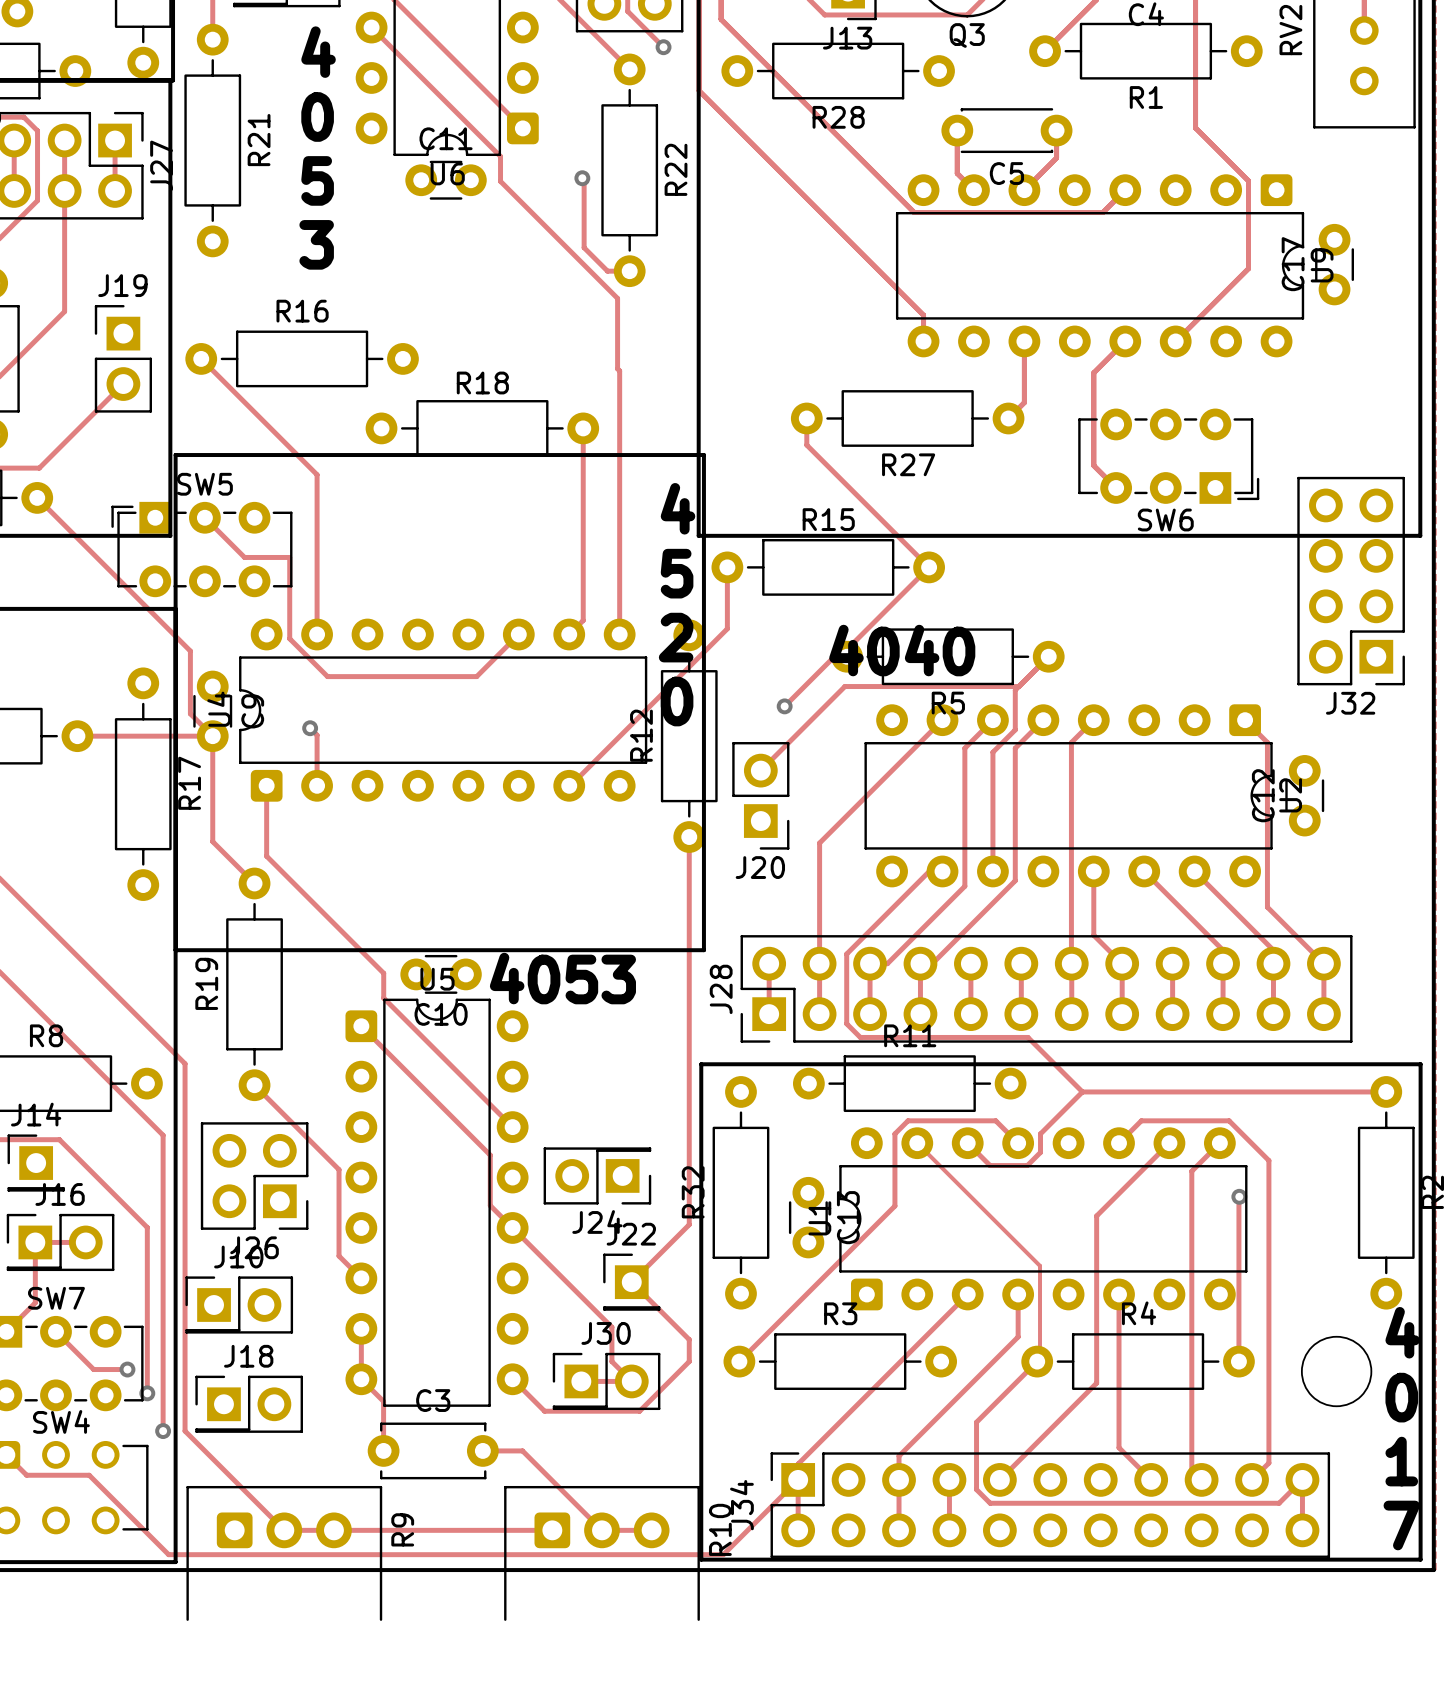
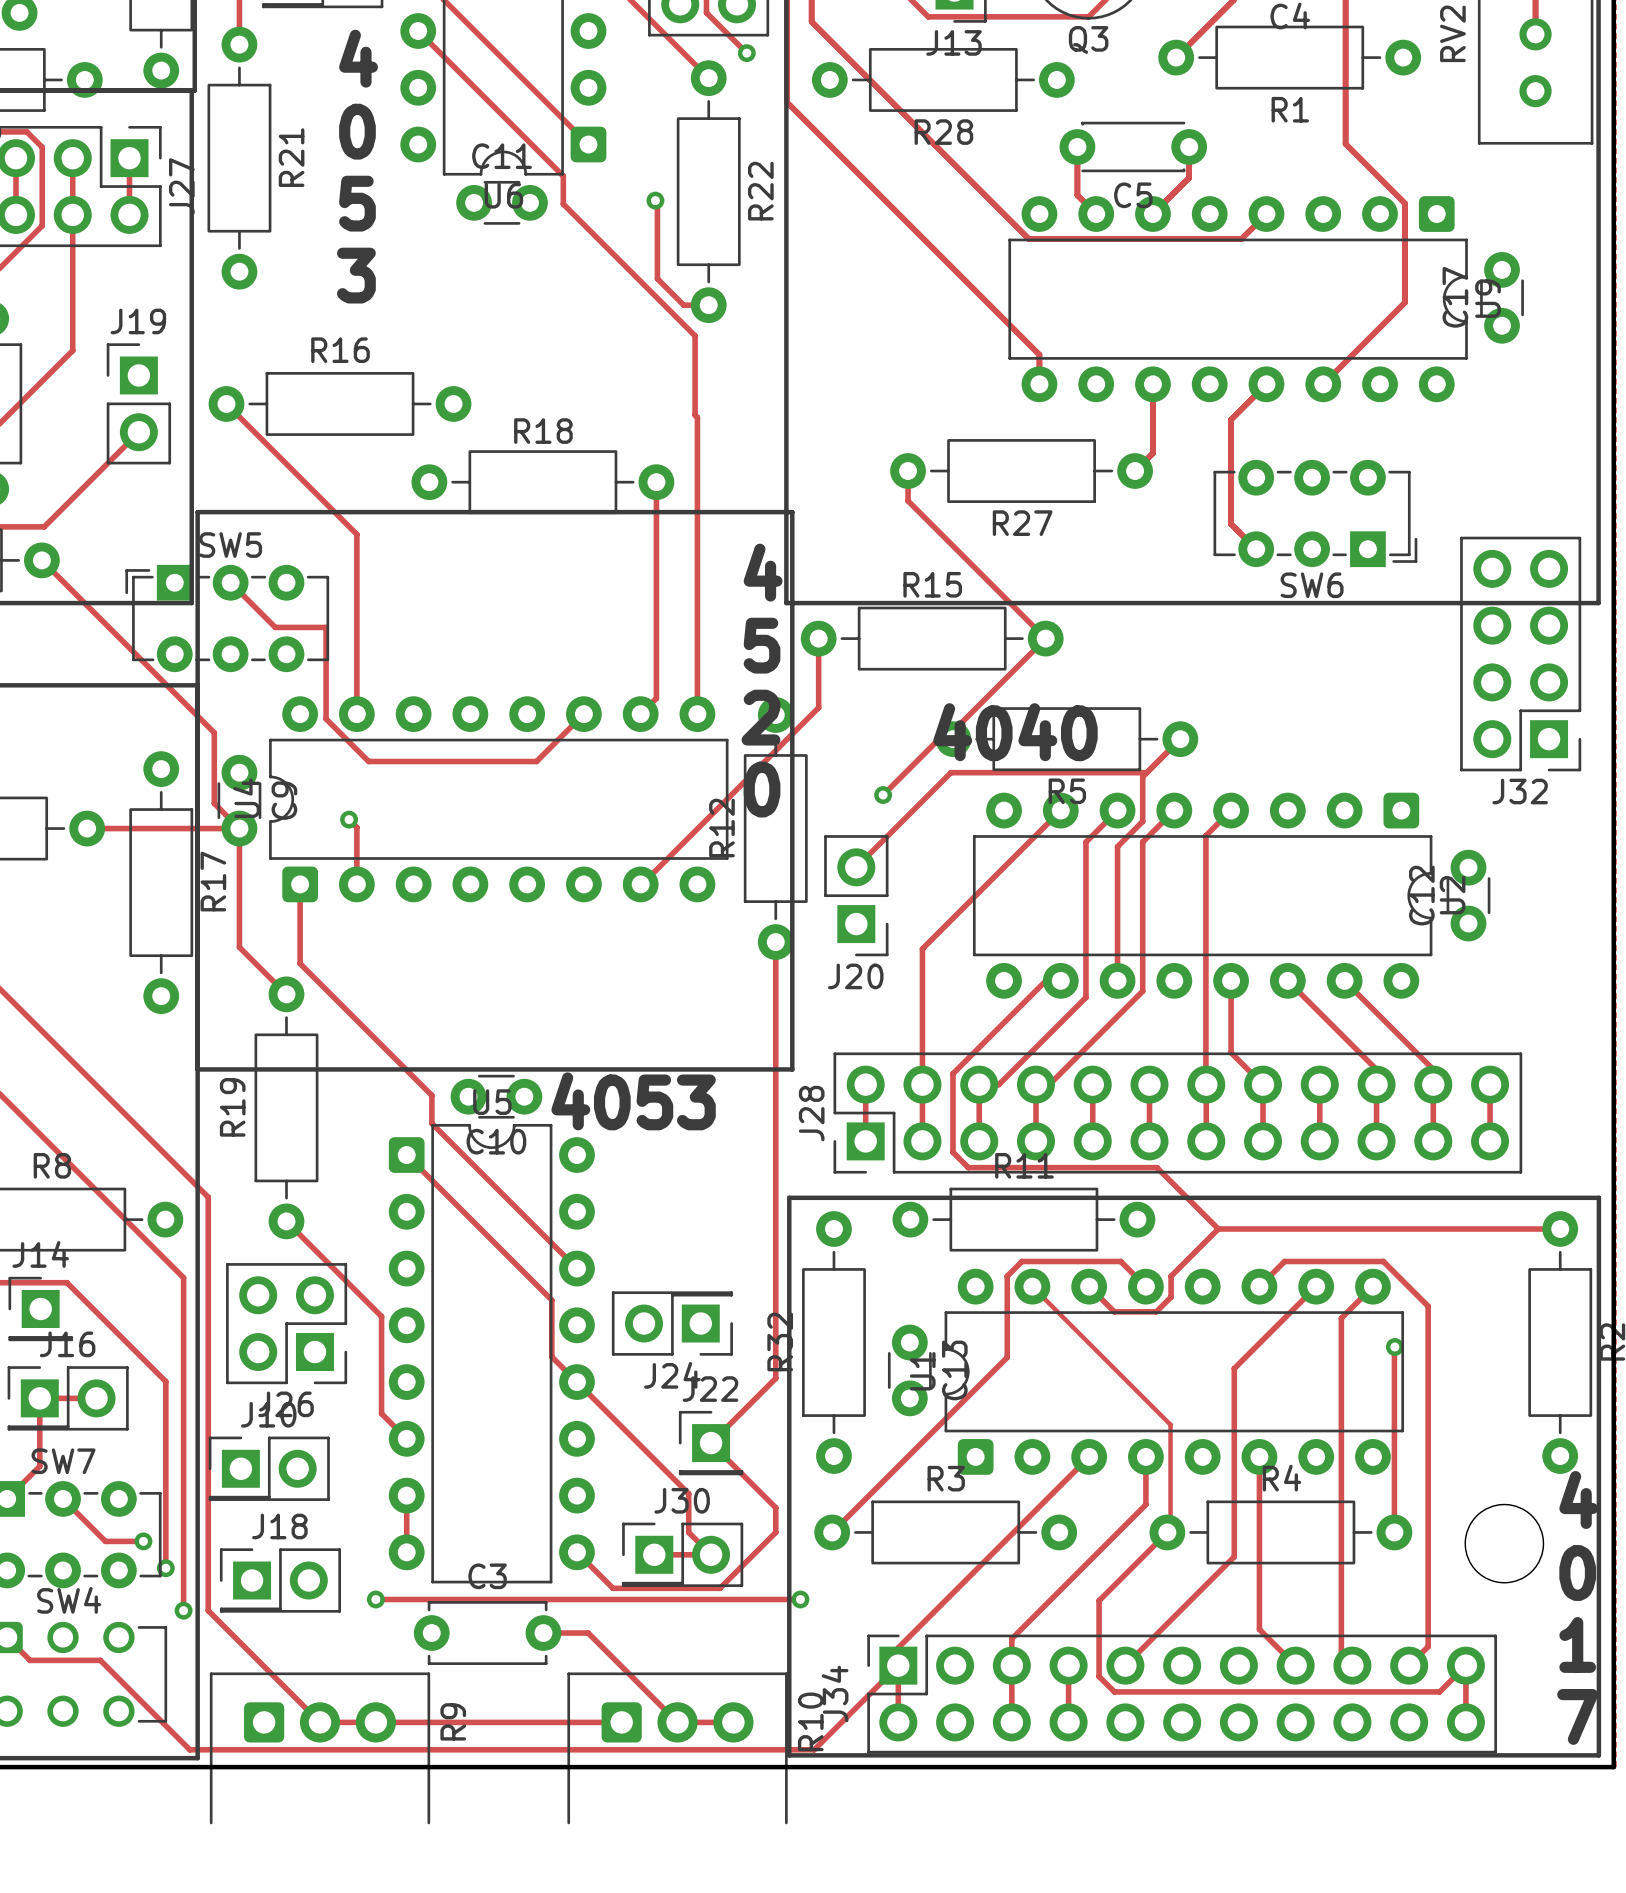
track: (1245, 720) (1267, 742) (1267, 907) (1323, 963) -> none
track: (361, 1379) (383, 1401) (383, 1450) -> none
track: none -> (375, 1599) (800, 1599)
via: none -> (375, 1599)
via: none -> (800, 1599)

